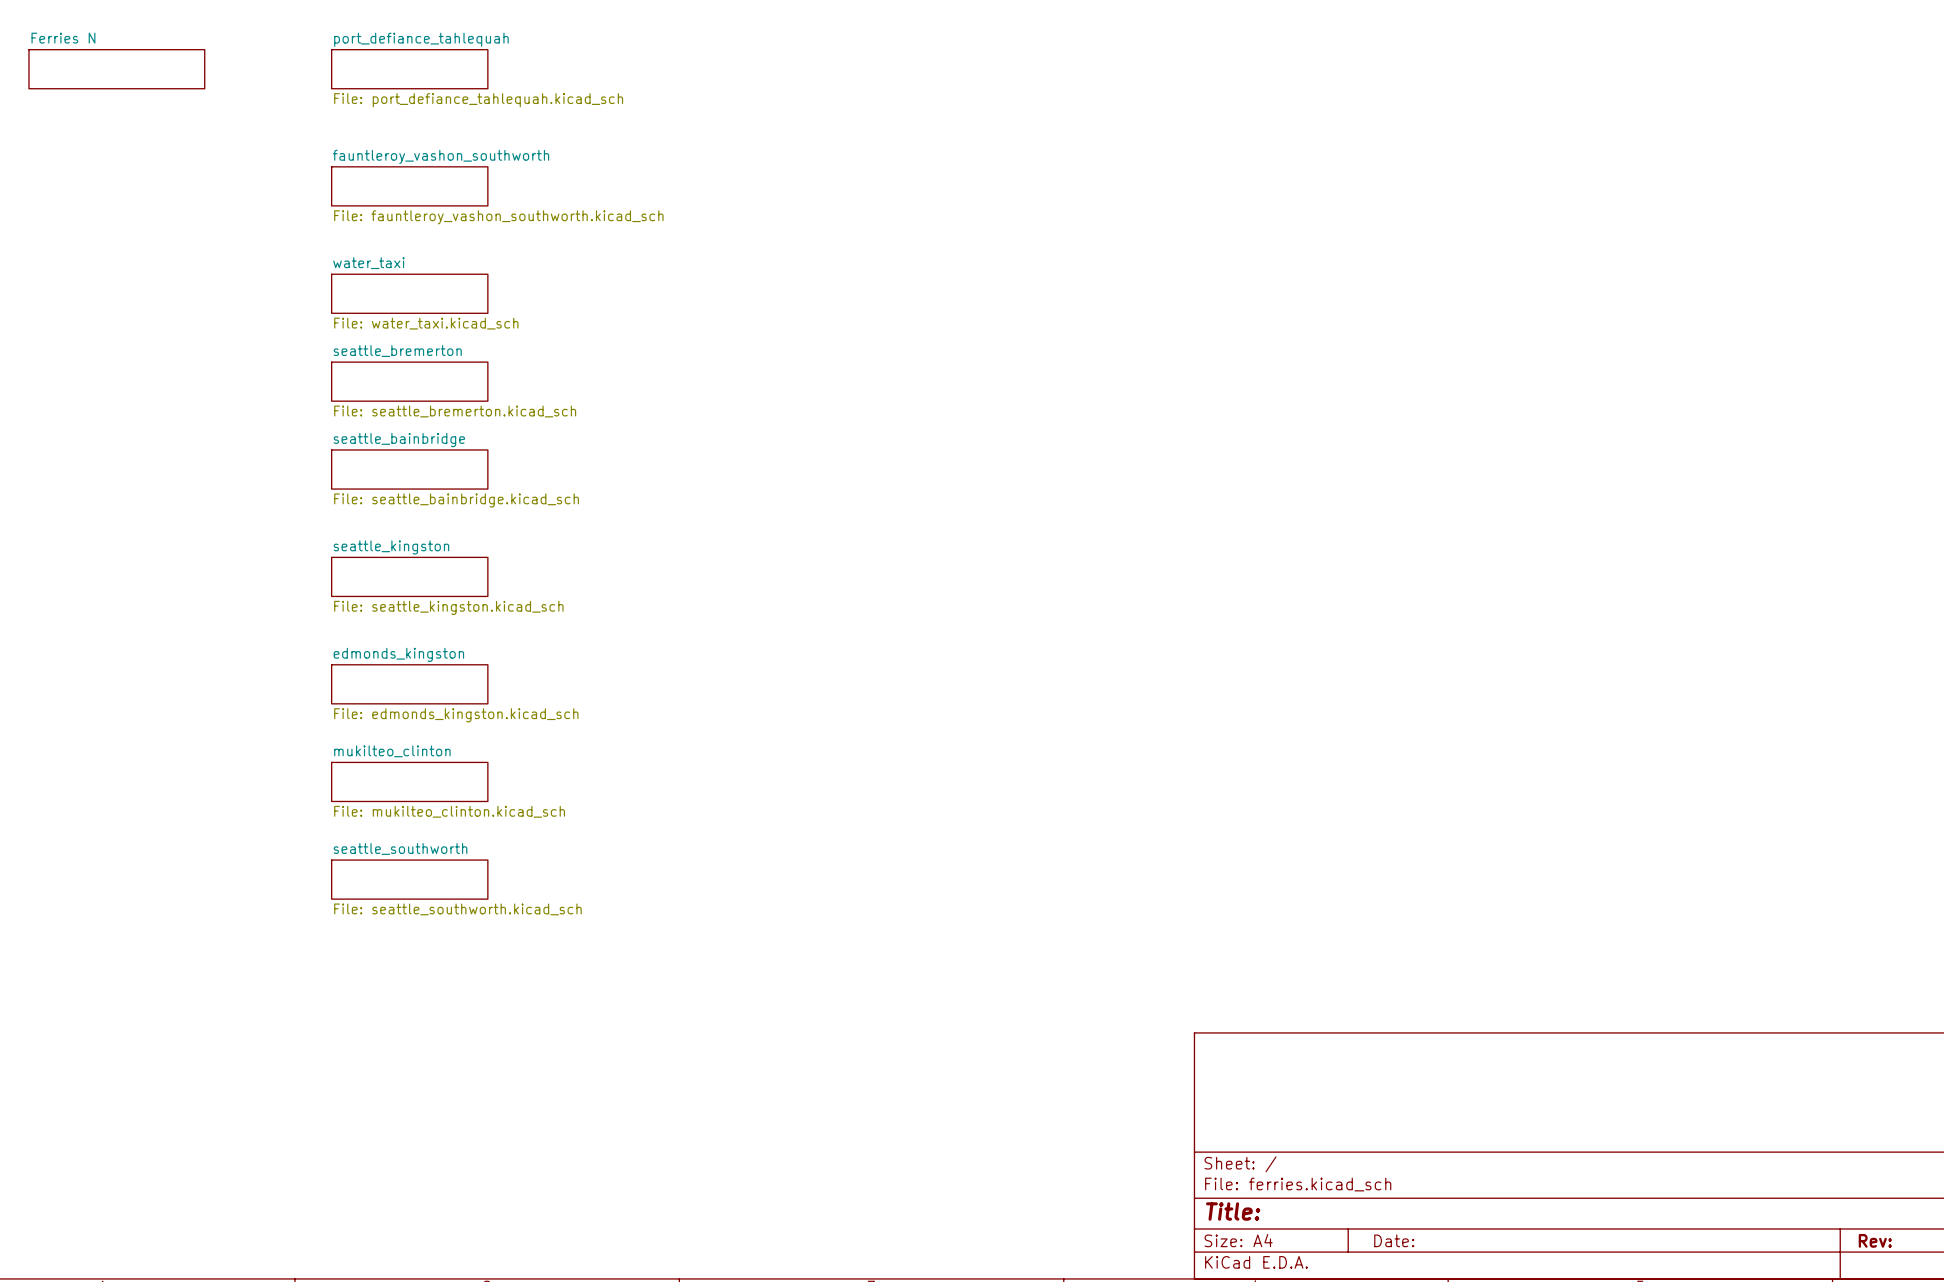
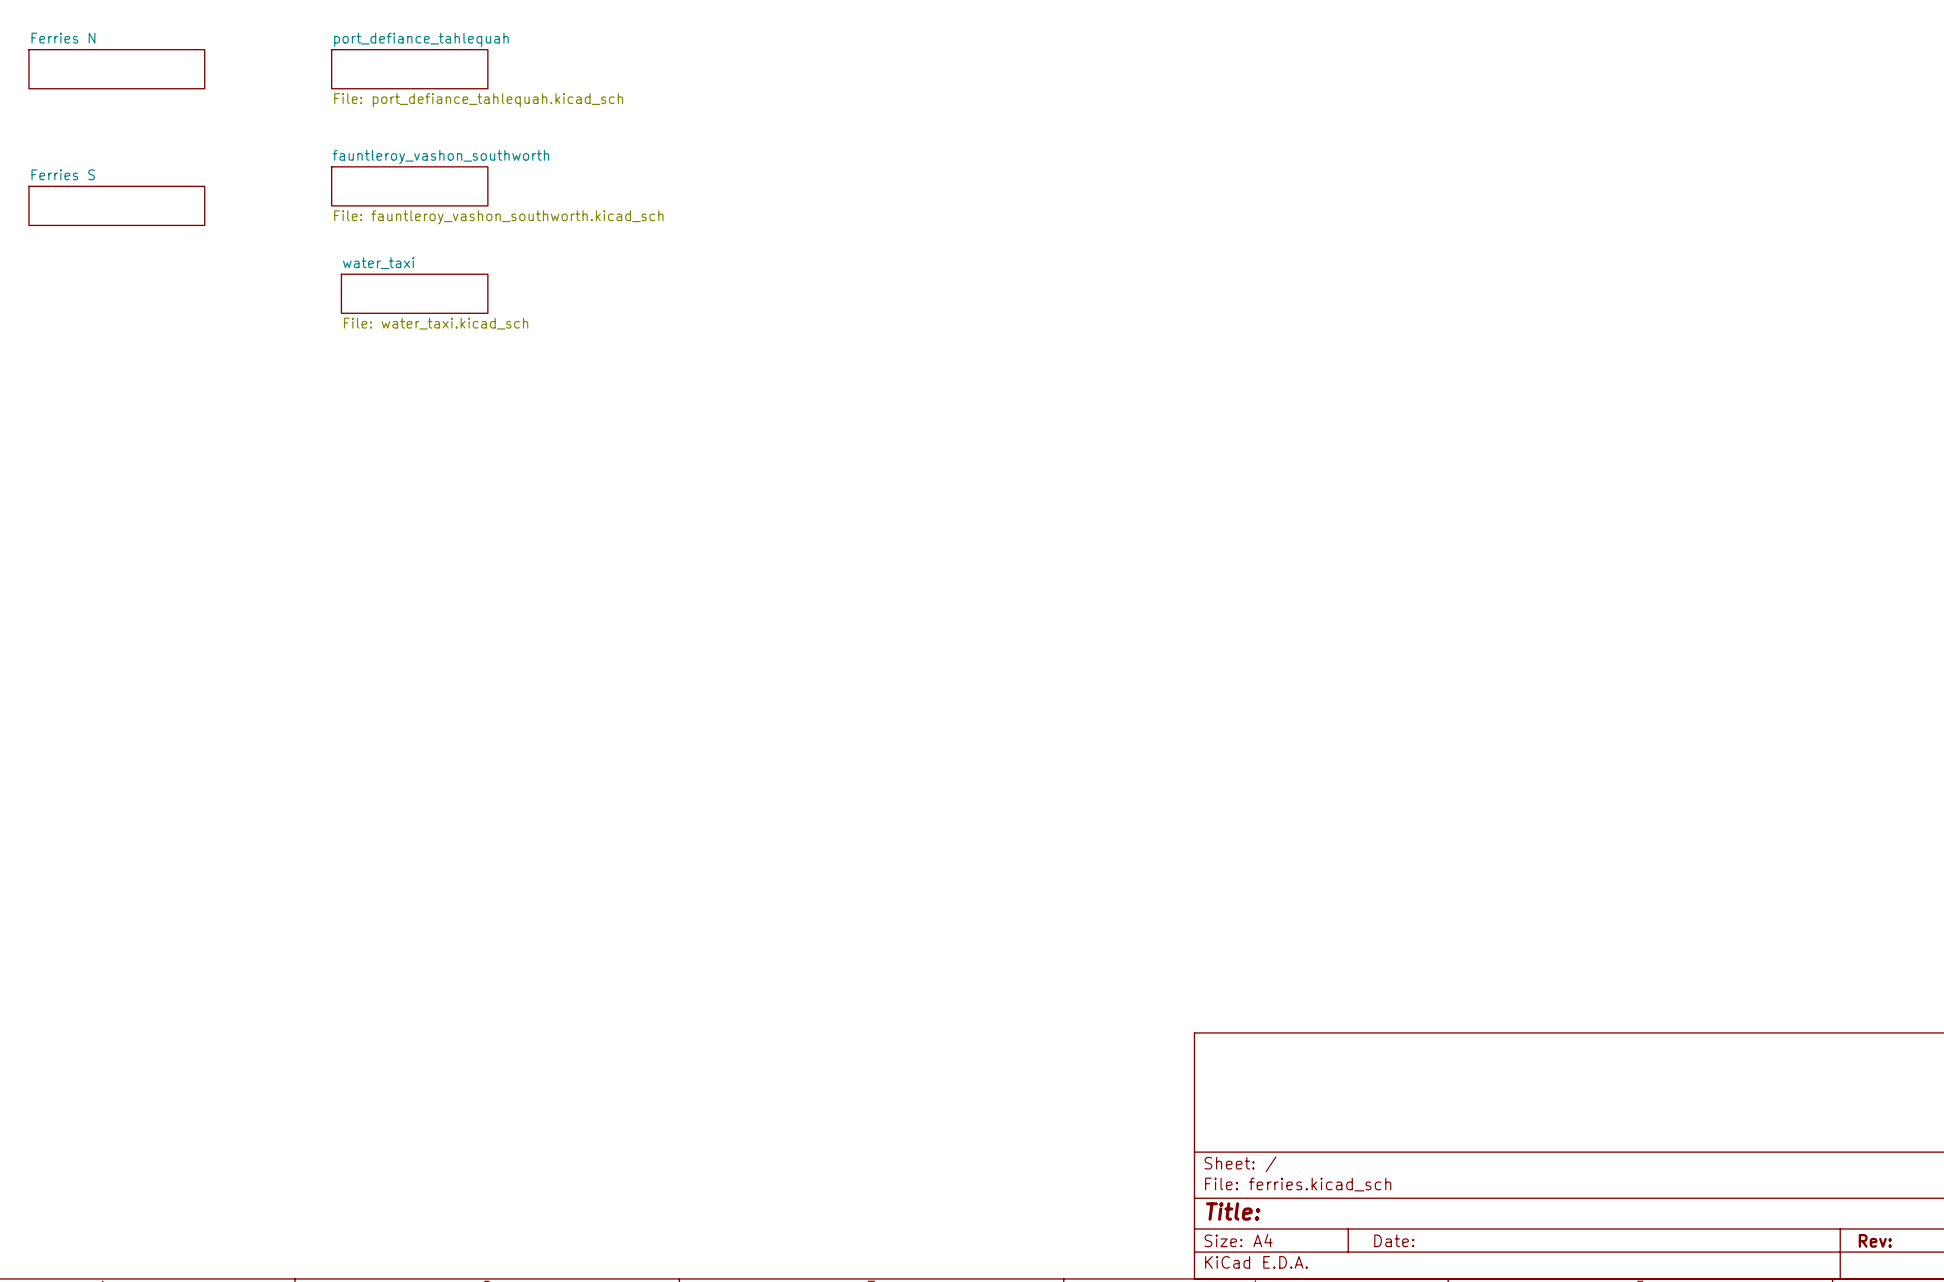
sheet Ferries S: none -> (116, 205)
sheet water_taxi shape: [331, 273, 489, 314] -> [340, 273, 489, 314]
sheet seattle_bremerton: File: seattle_bremerton.kicad_sch (409, 381) -> none
sheet seattle_bainbridge: File: seattle_bainbridge.kicad_sch (409, 469) -> none
sheet seattle_kingston: File: seattle_kingston.kicad_sch (409, 576) -> none
sheet edmonds_kingston: File: edmonds_kingston.kicad_sch (409, 684) -> none
sheet mukilteo_clinton: File: mukilteo_clinton.kicad_sch (409, 781) -> none
sheet seattle_southworth: File: seattle_southworth.kicad_sch (409, 879) -> none

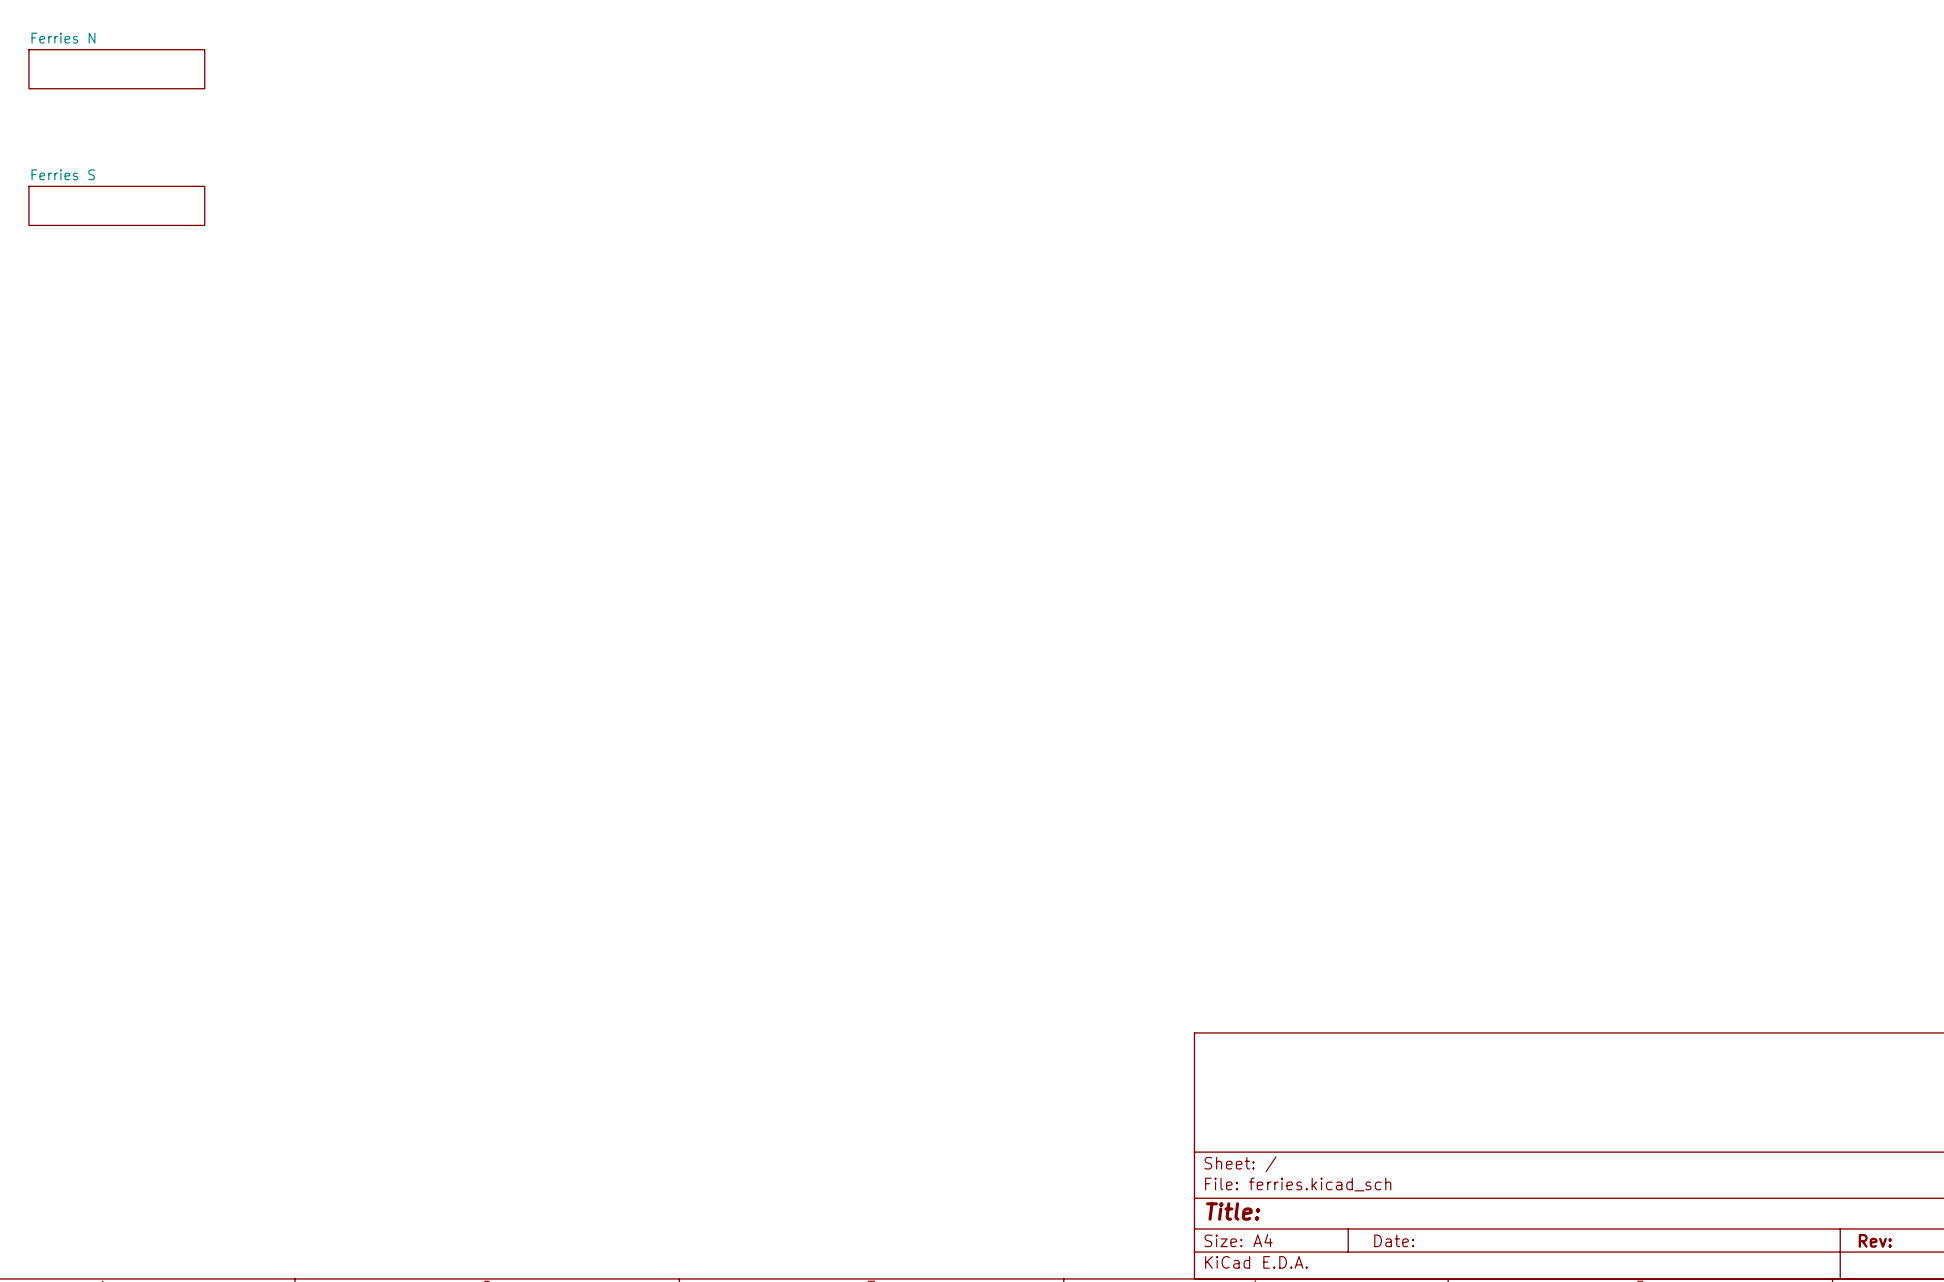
sheet port_defiance_tahlequah: File: port_defiance_tahlequah.kicad_sch (409, 69) -> none
sheet fauntleroy_vashon_southworth: File: fauntleroy_vashon_southworth.kicad_sch (409, 186) -> none
sheet water_taxi: File: water_taxi.kicad_sch (414, 293) -> none

